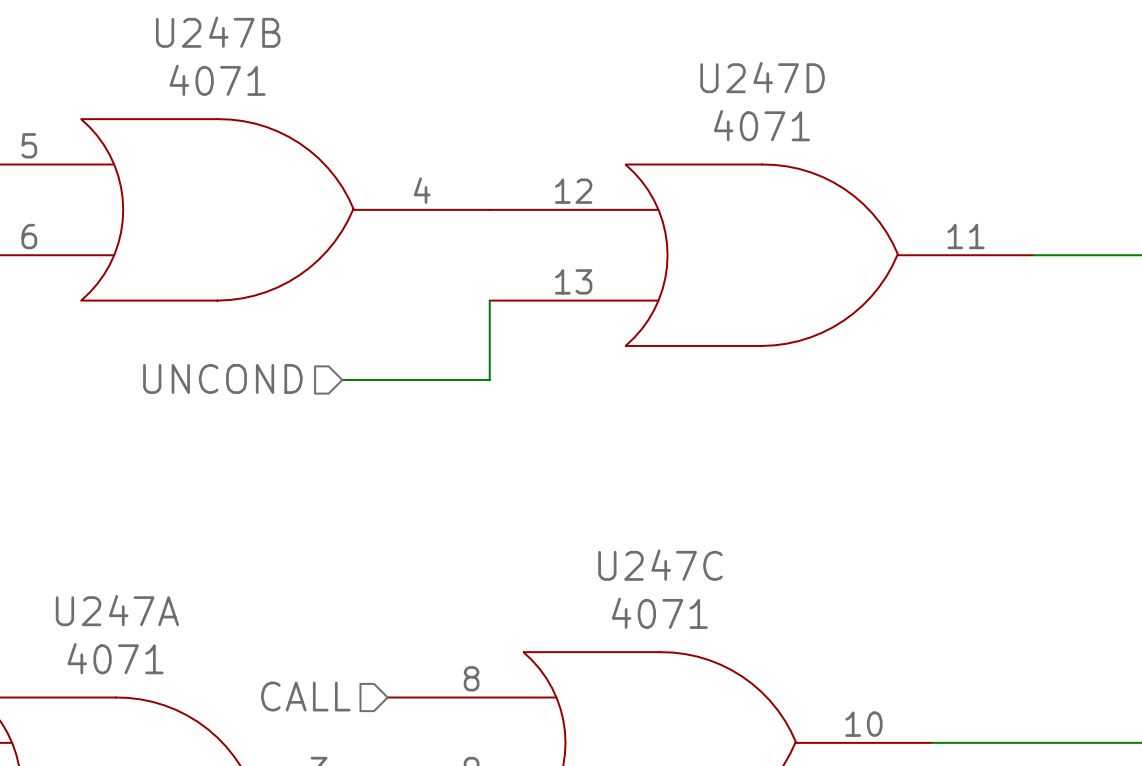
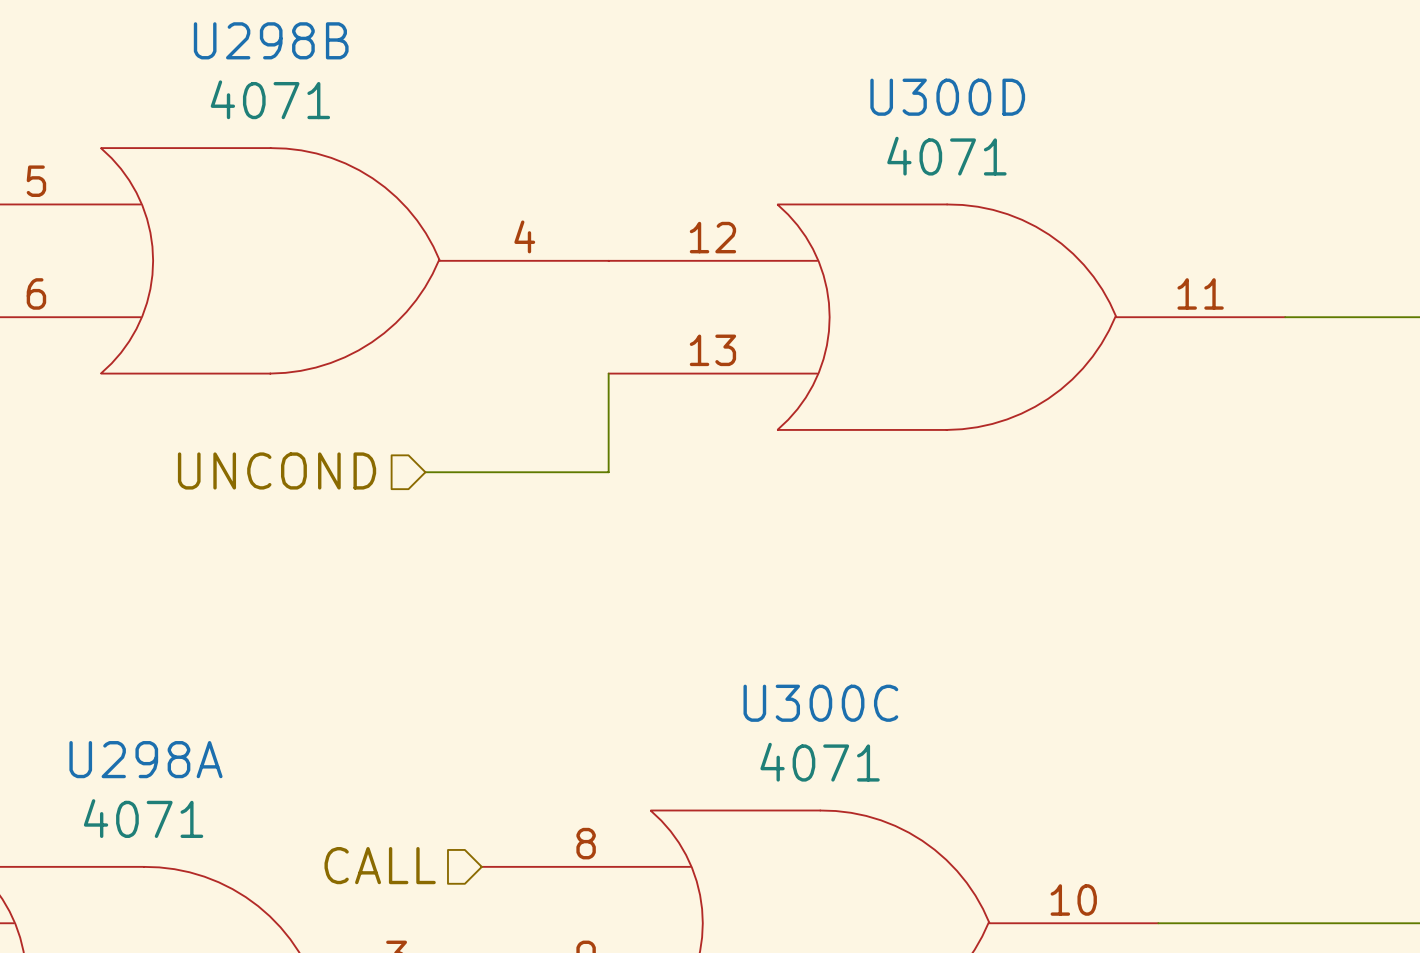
U247B name: U247B (218, 32) -> U298B (271, 40)
U247D name: U247D (762, 77) -> U300D (947, 97)
U247C name: U247C (660, 565) -> U300C (820, 703)
U247A name: U247A (117, 610) -> U298A (145, 759)

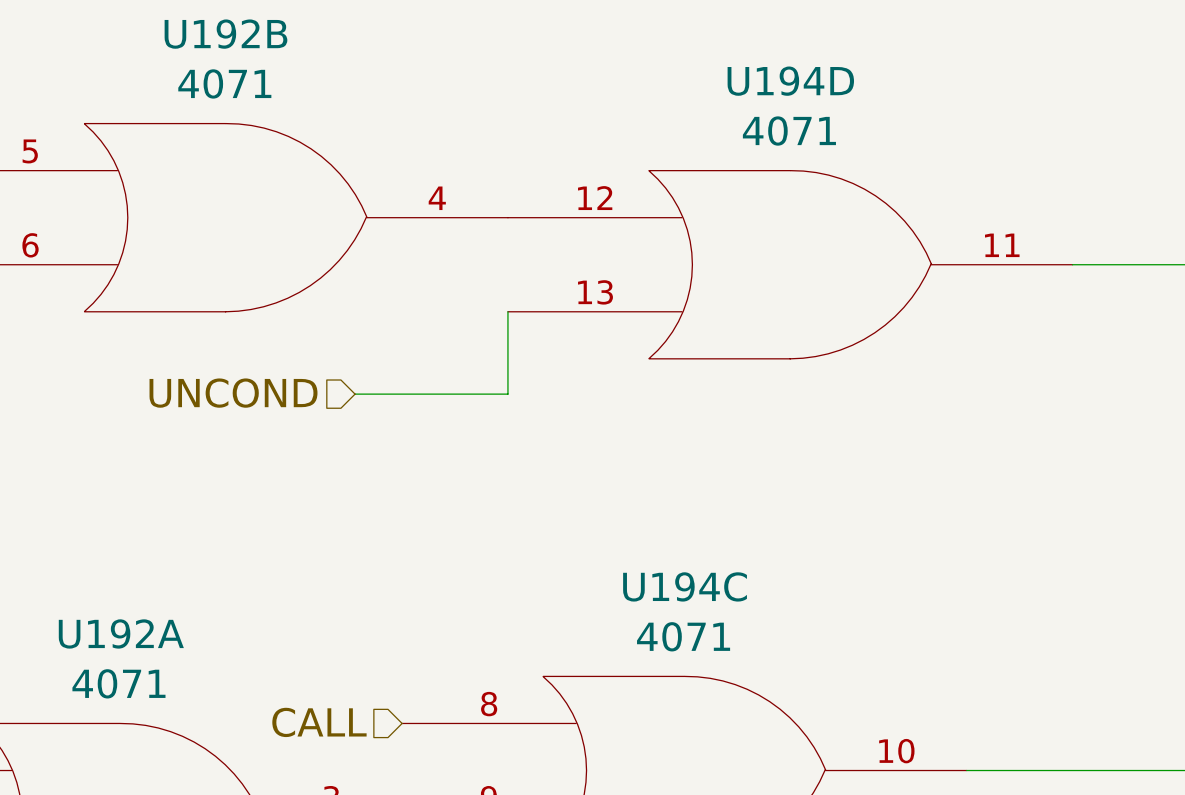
U298B name: U298B (271, 40) -> U192B (225, 34)
U300D name: U300D (947, 97) -> U194D (790, 81)
U300C name: U300C (820, 703) -> U194C (685, 586)
U298A name: U298A (145, 759) -> U192A (121, 633)

